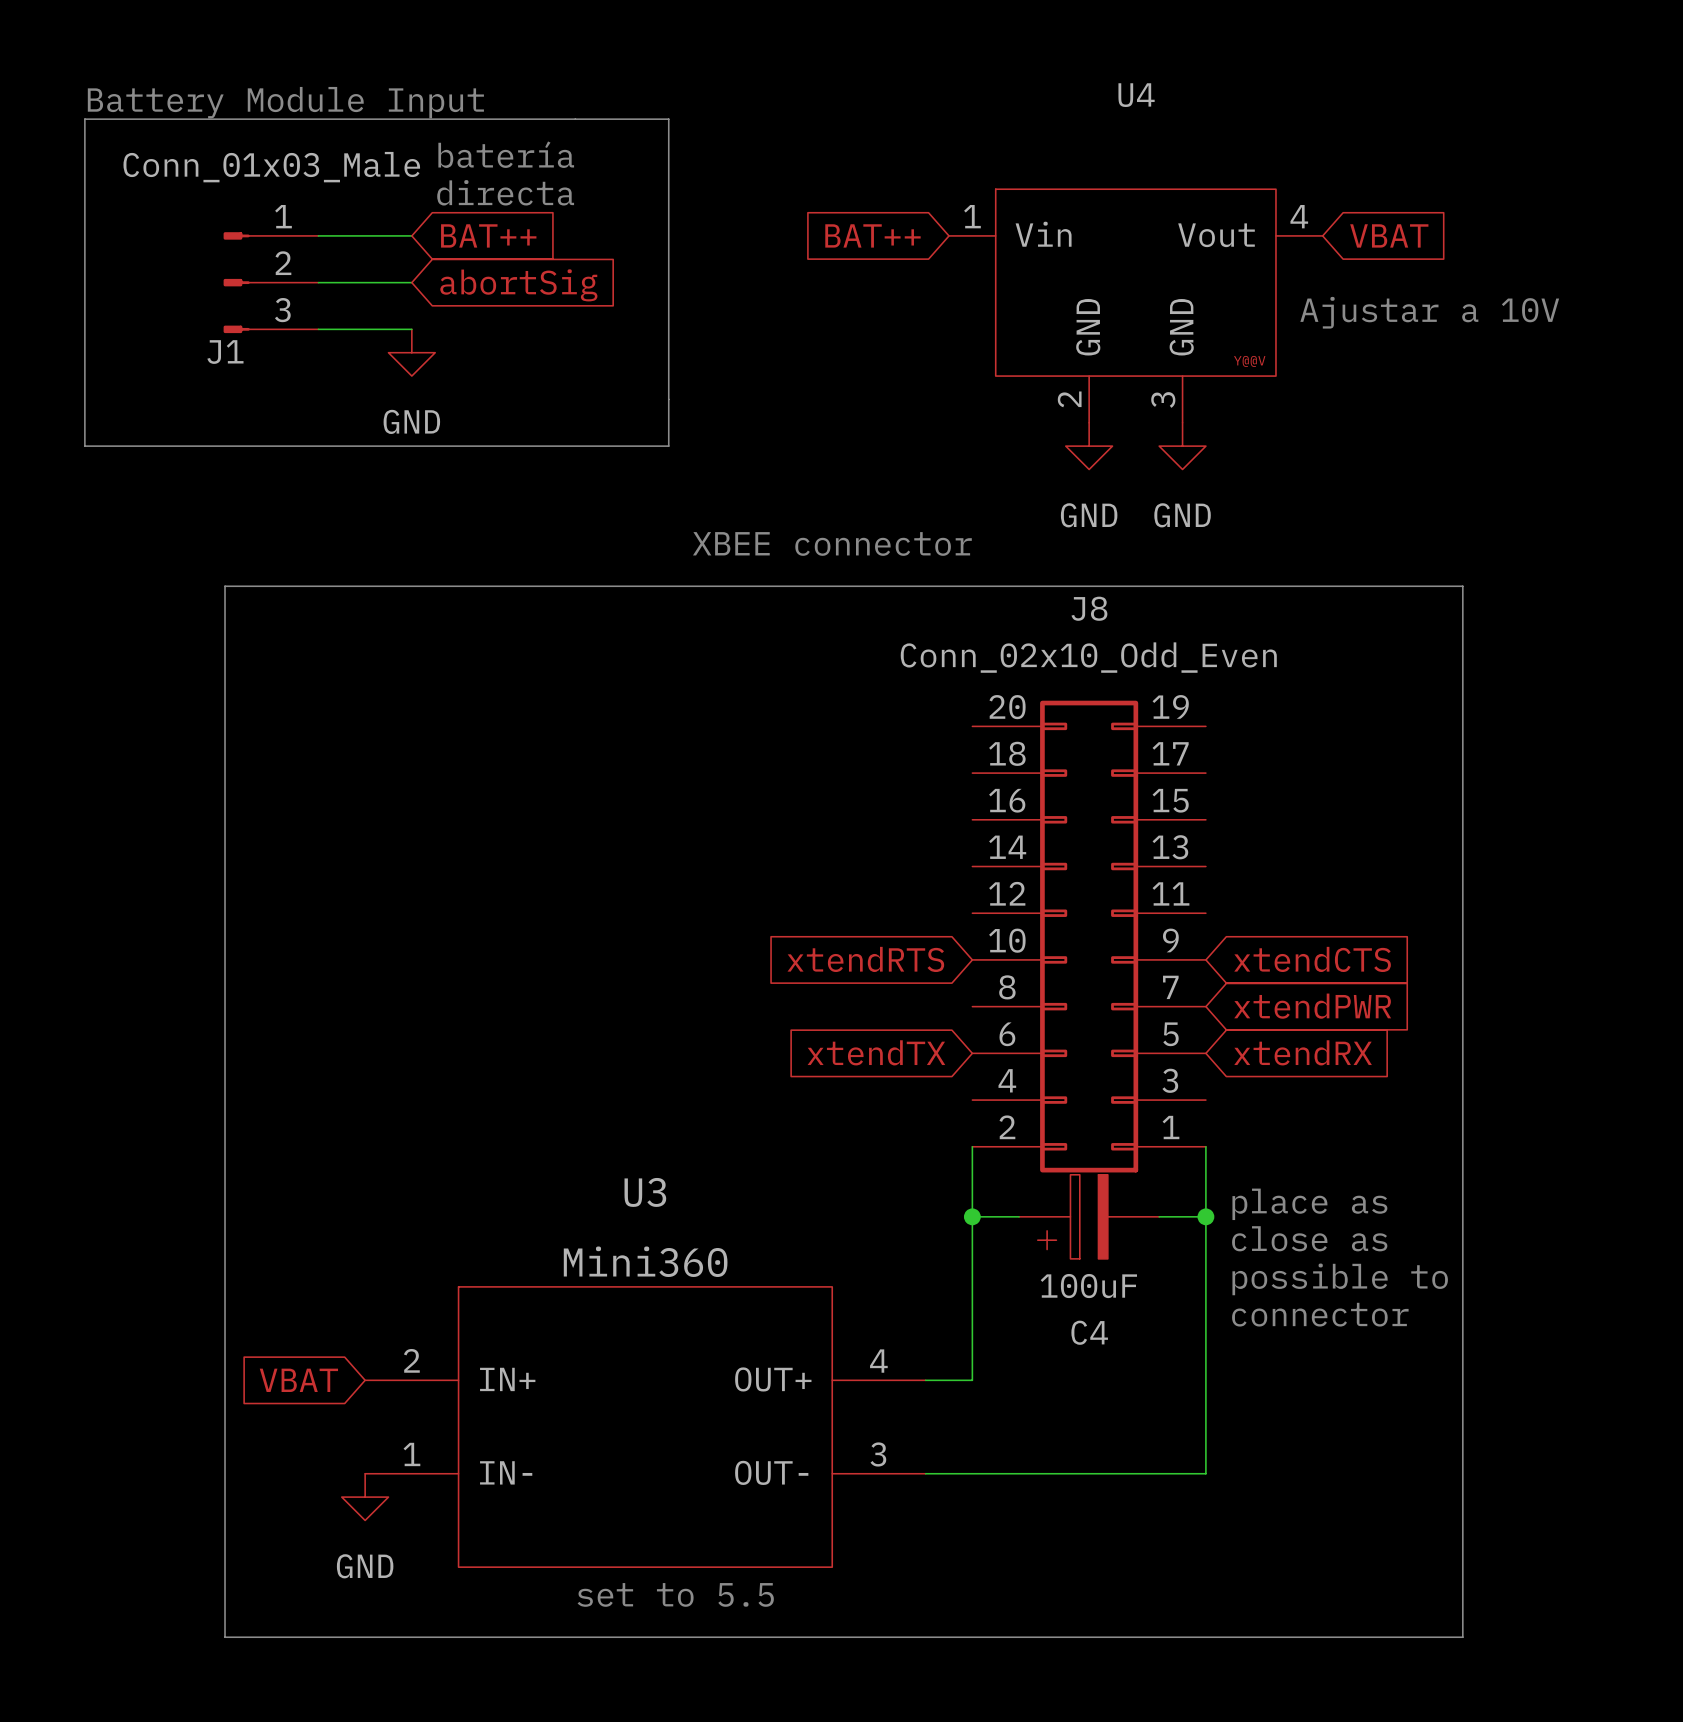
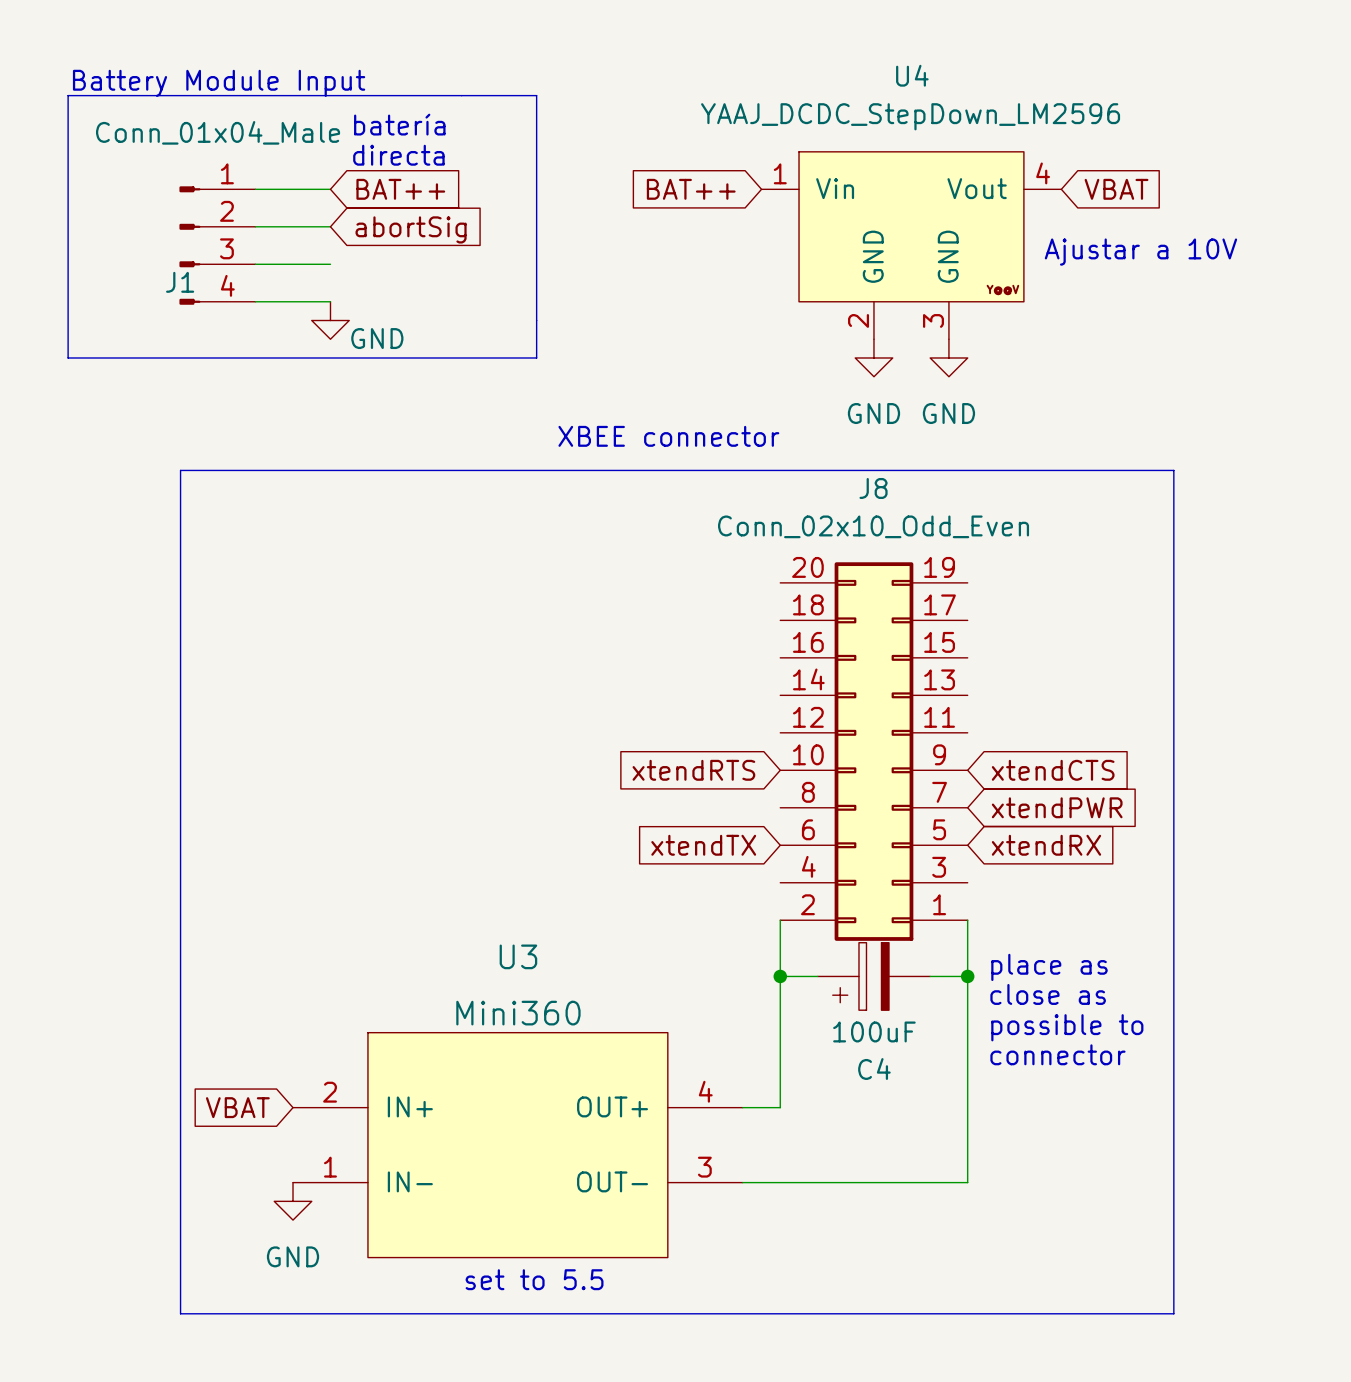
U4 value: none -> YAAJ_DCDC_StepDown_LM2596 (910, 116)
J1 value: Conn_01x03_Male (271, 167) -> Conn_01x04_Male (218, 132)
J1 symbol: [223, 232, 319, 334] -> [179, 186, 256, 305]
power symbol position: GND (411, 352) -> GND (330, 320)
wire: none -> (255, 301) (330, 301)
power symbol text position: GND (411, 421) -> GND (377, 338)

